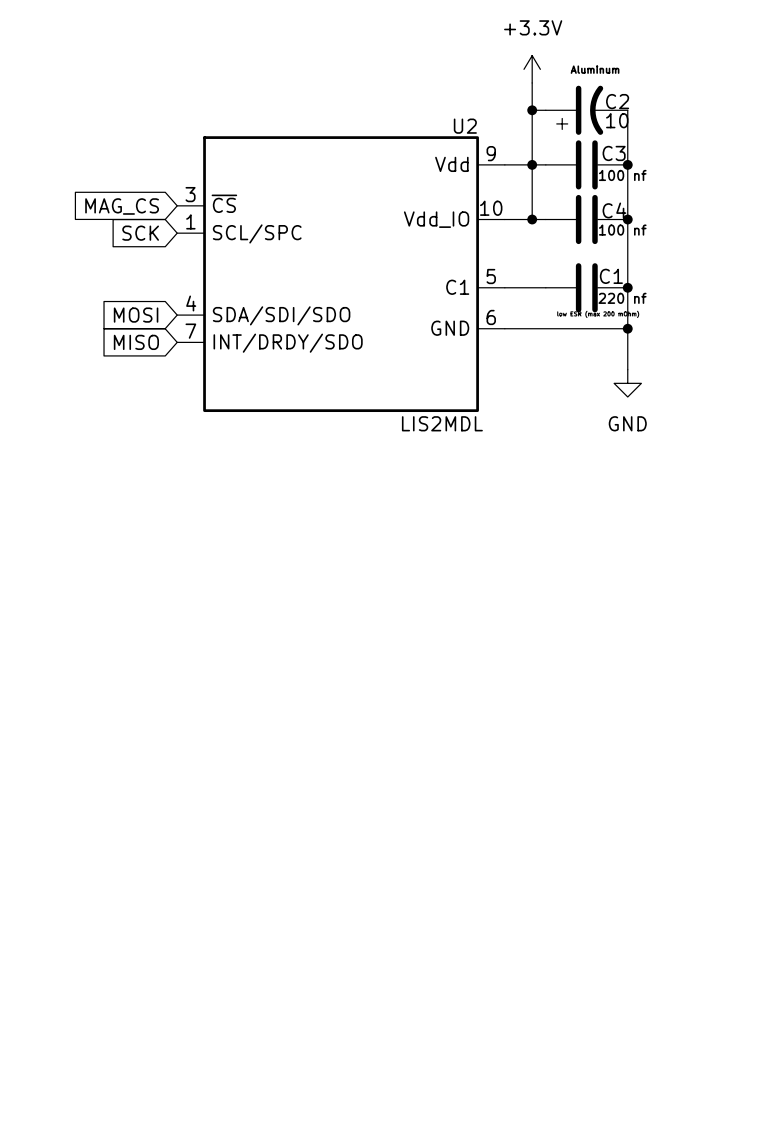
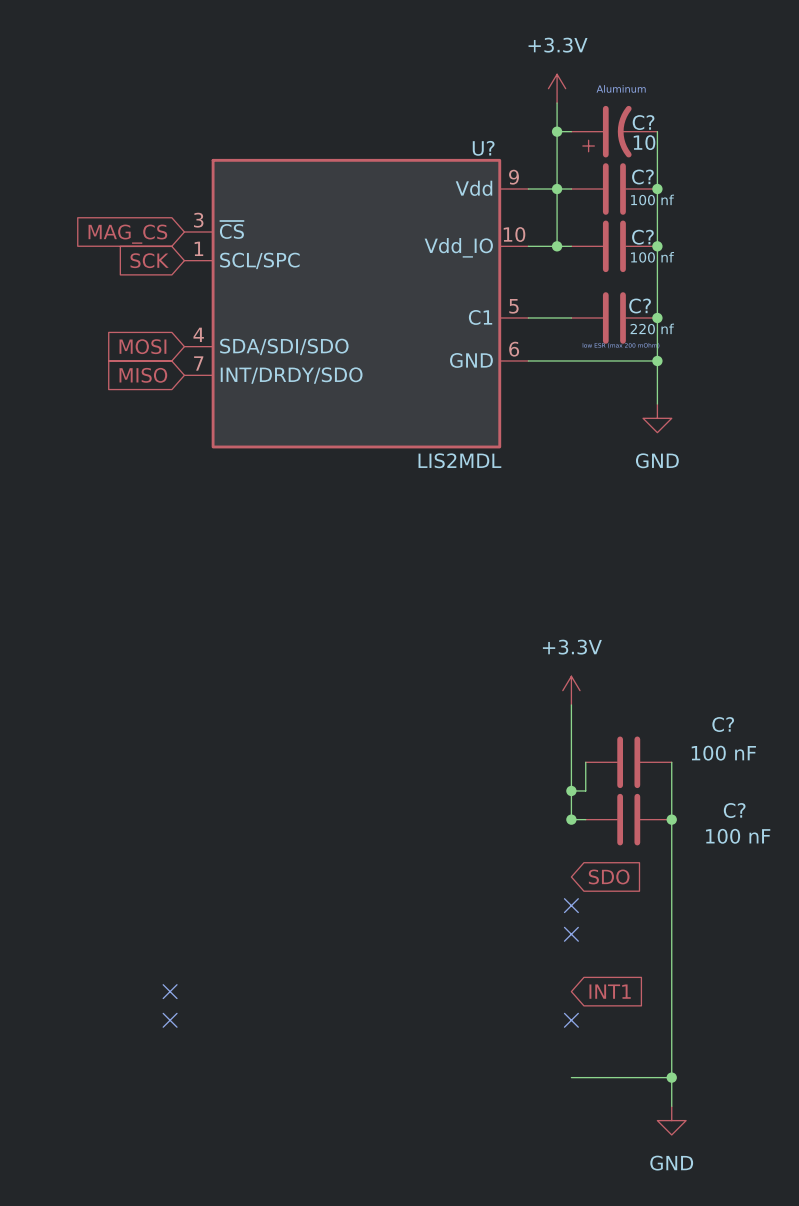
C2 name: C2 (617, 101) -> C? (643, 122)
U2 name: U2 (465, 126) -> U? (483, 148)
C3 name: C3 (614, 153) -> C? (642, 177)
C4 name: C4 (614, 210) -> C? (642, 237)
C1 name: C1 (611, 276) -> C? (640, 306)
power symbol: none -> +3.3V (571, 690)
wire: none -> (571, 704) (571, 819) (585, 819)
wire: none -> (585, 762) (585, 790) (571, 790)
C?: none -> 100 nF (628, 762)
wire: none -> (671, 762) (671, 1106)
junction: none -> (571, 790)
junction: none -> (571, 819)
C?: none -> 100 nF (628, 819)
junction: none -> (671, 819)
global label: none -> SDO (609, 876)
no-connect mark: none -> (571, 905)
no-connect mark: none -> (571, 934)
no-connect mark: none -> (170, 991)
global label: none -> INT1 (610, 991)
no-connect mark: none -> (170, 1020)
no-connect mark: none -> (571, 1020)
wire: none -> (571, 1077) (671, 1077)
junction: none -> (671, 1077)
power symbol: none -> GND (671, 1120)

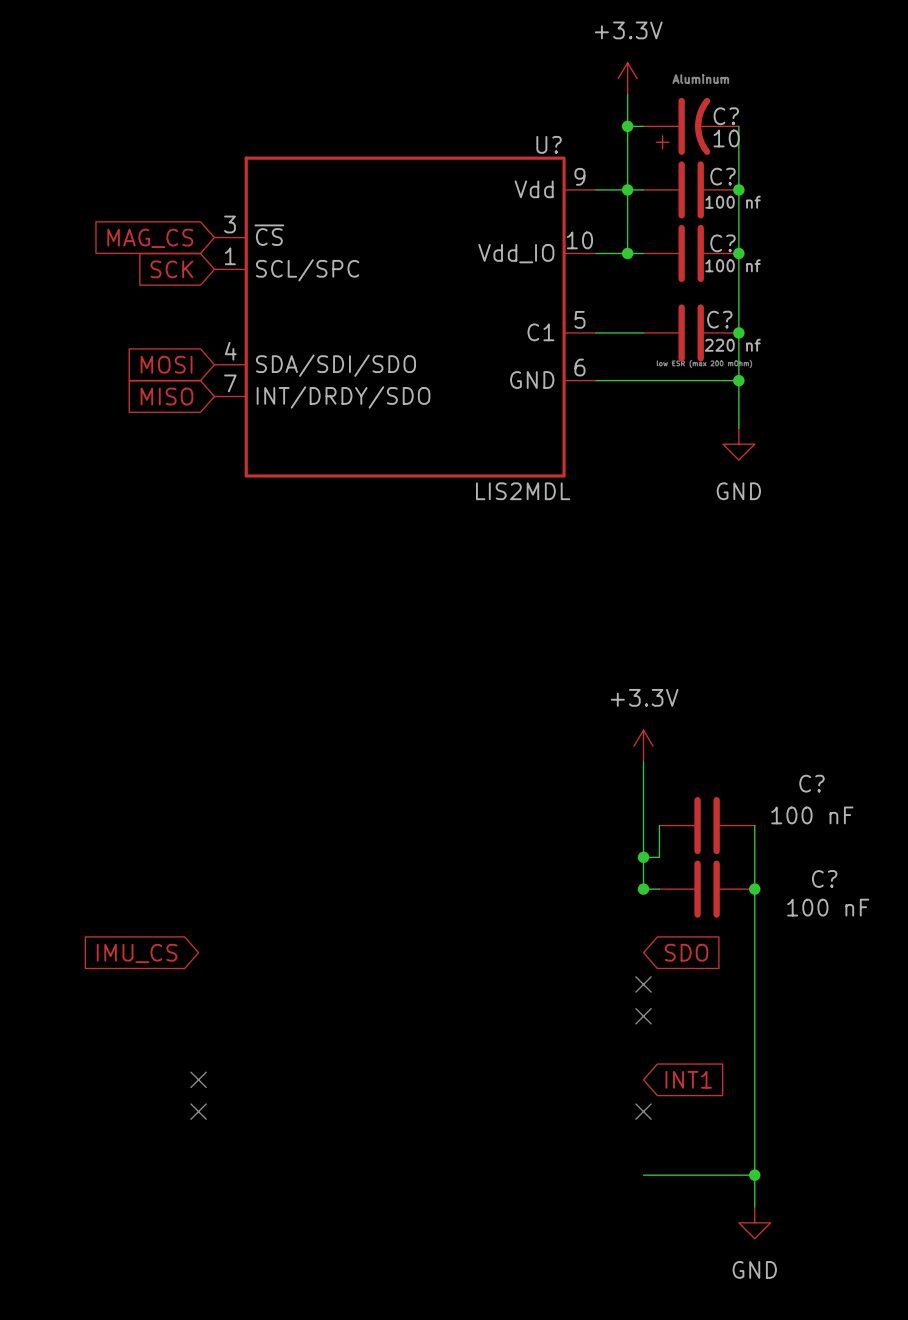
global label: none -> IMU_CS (137, 953)

